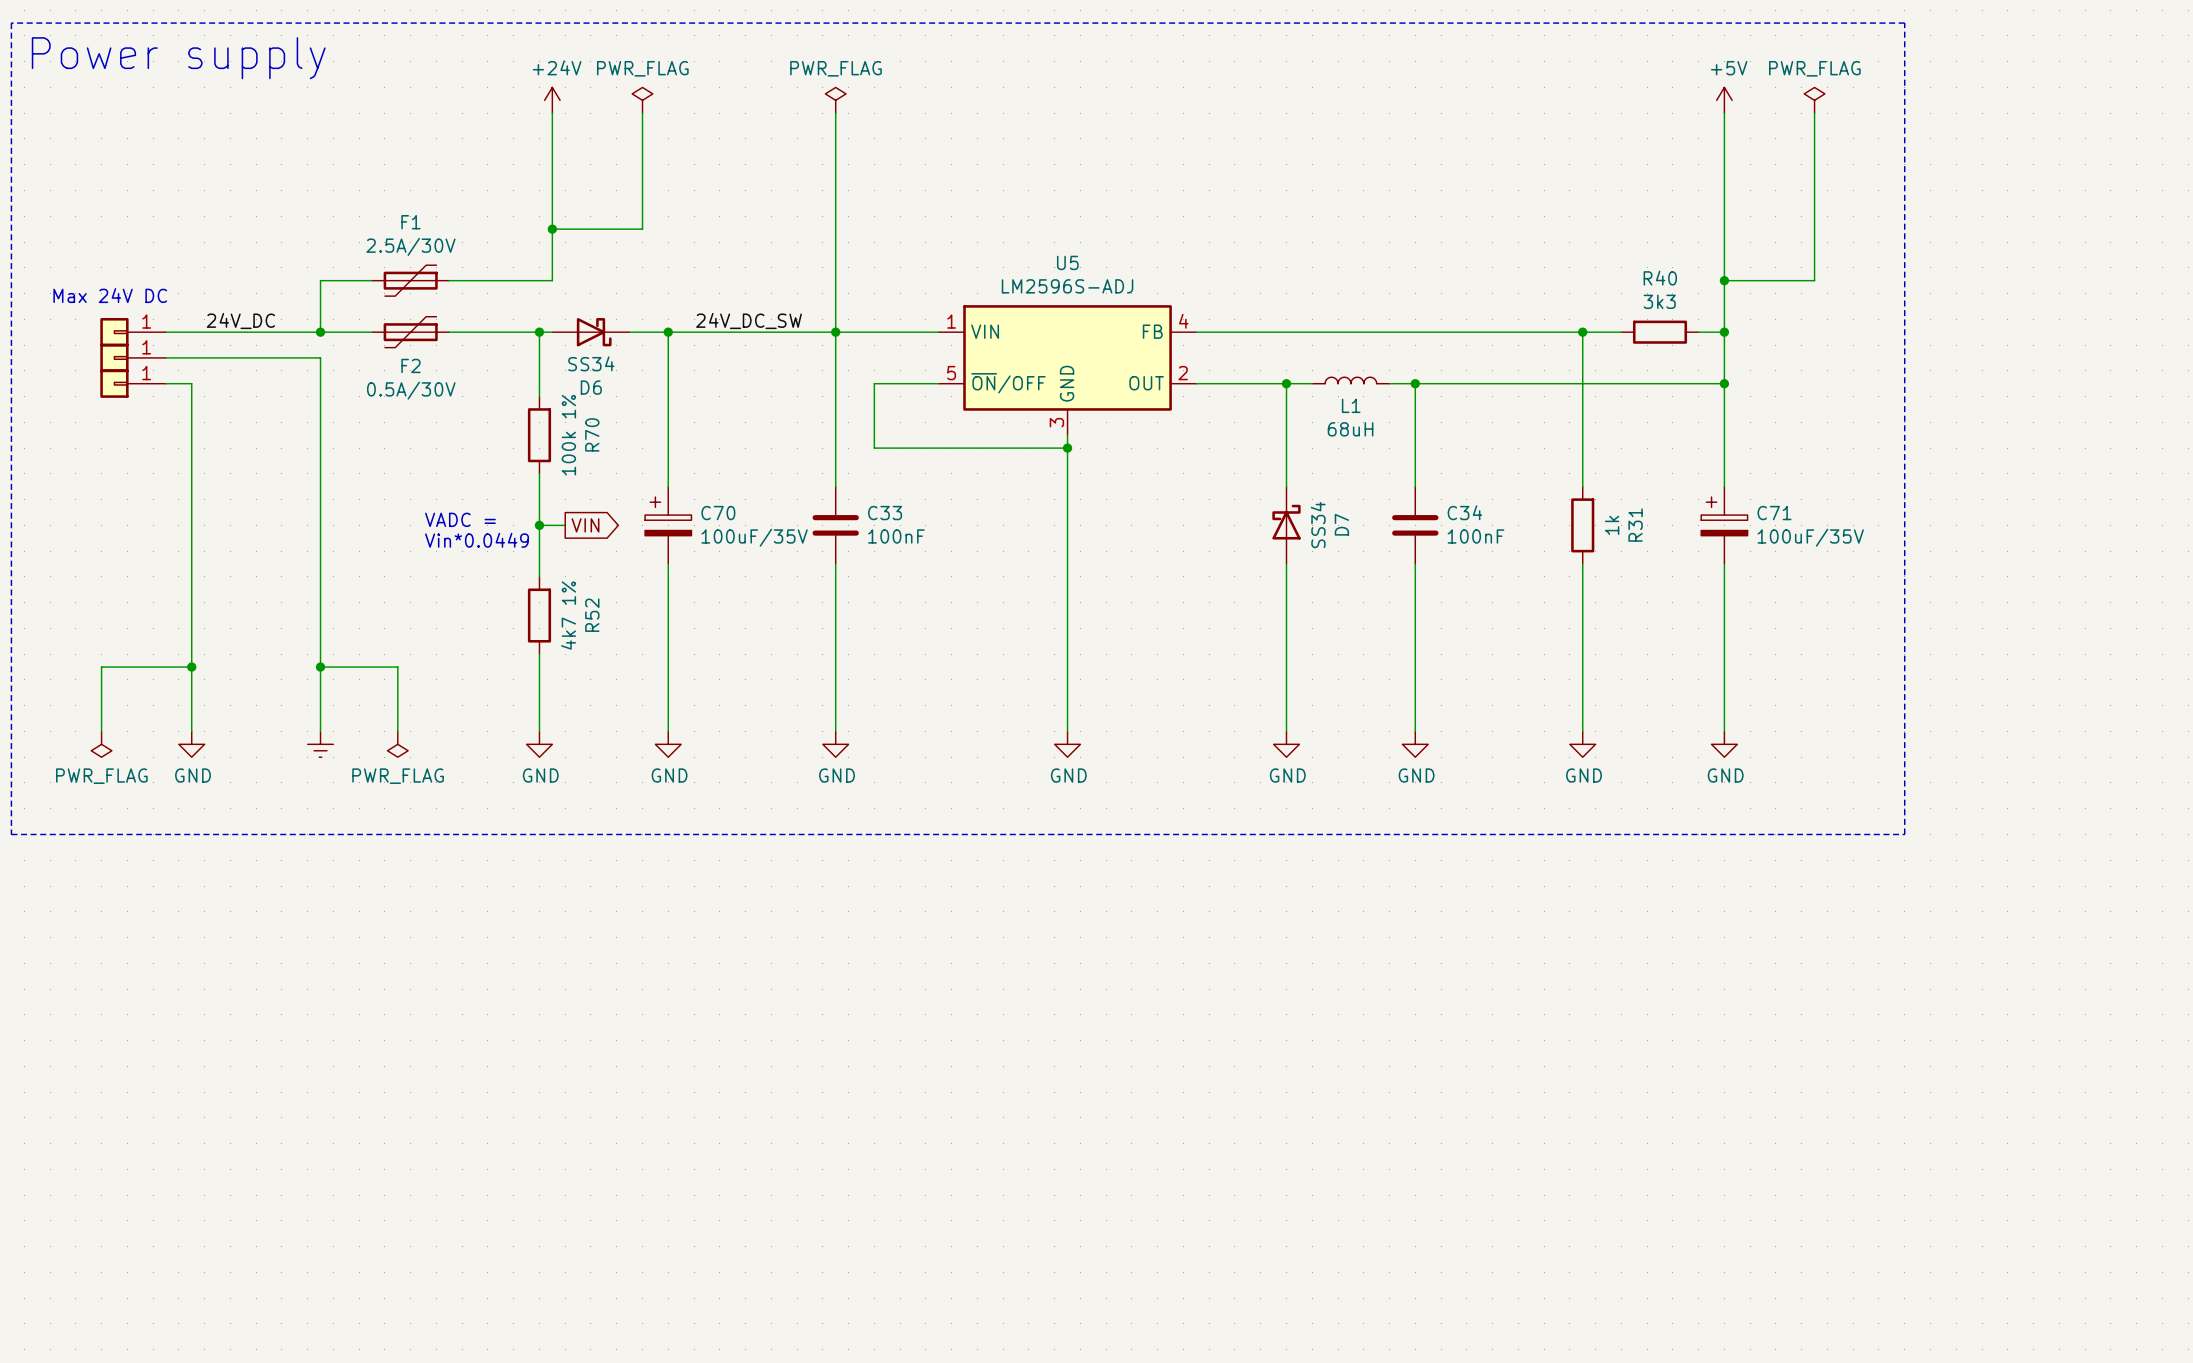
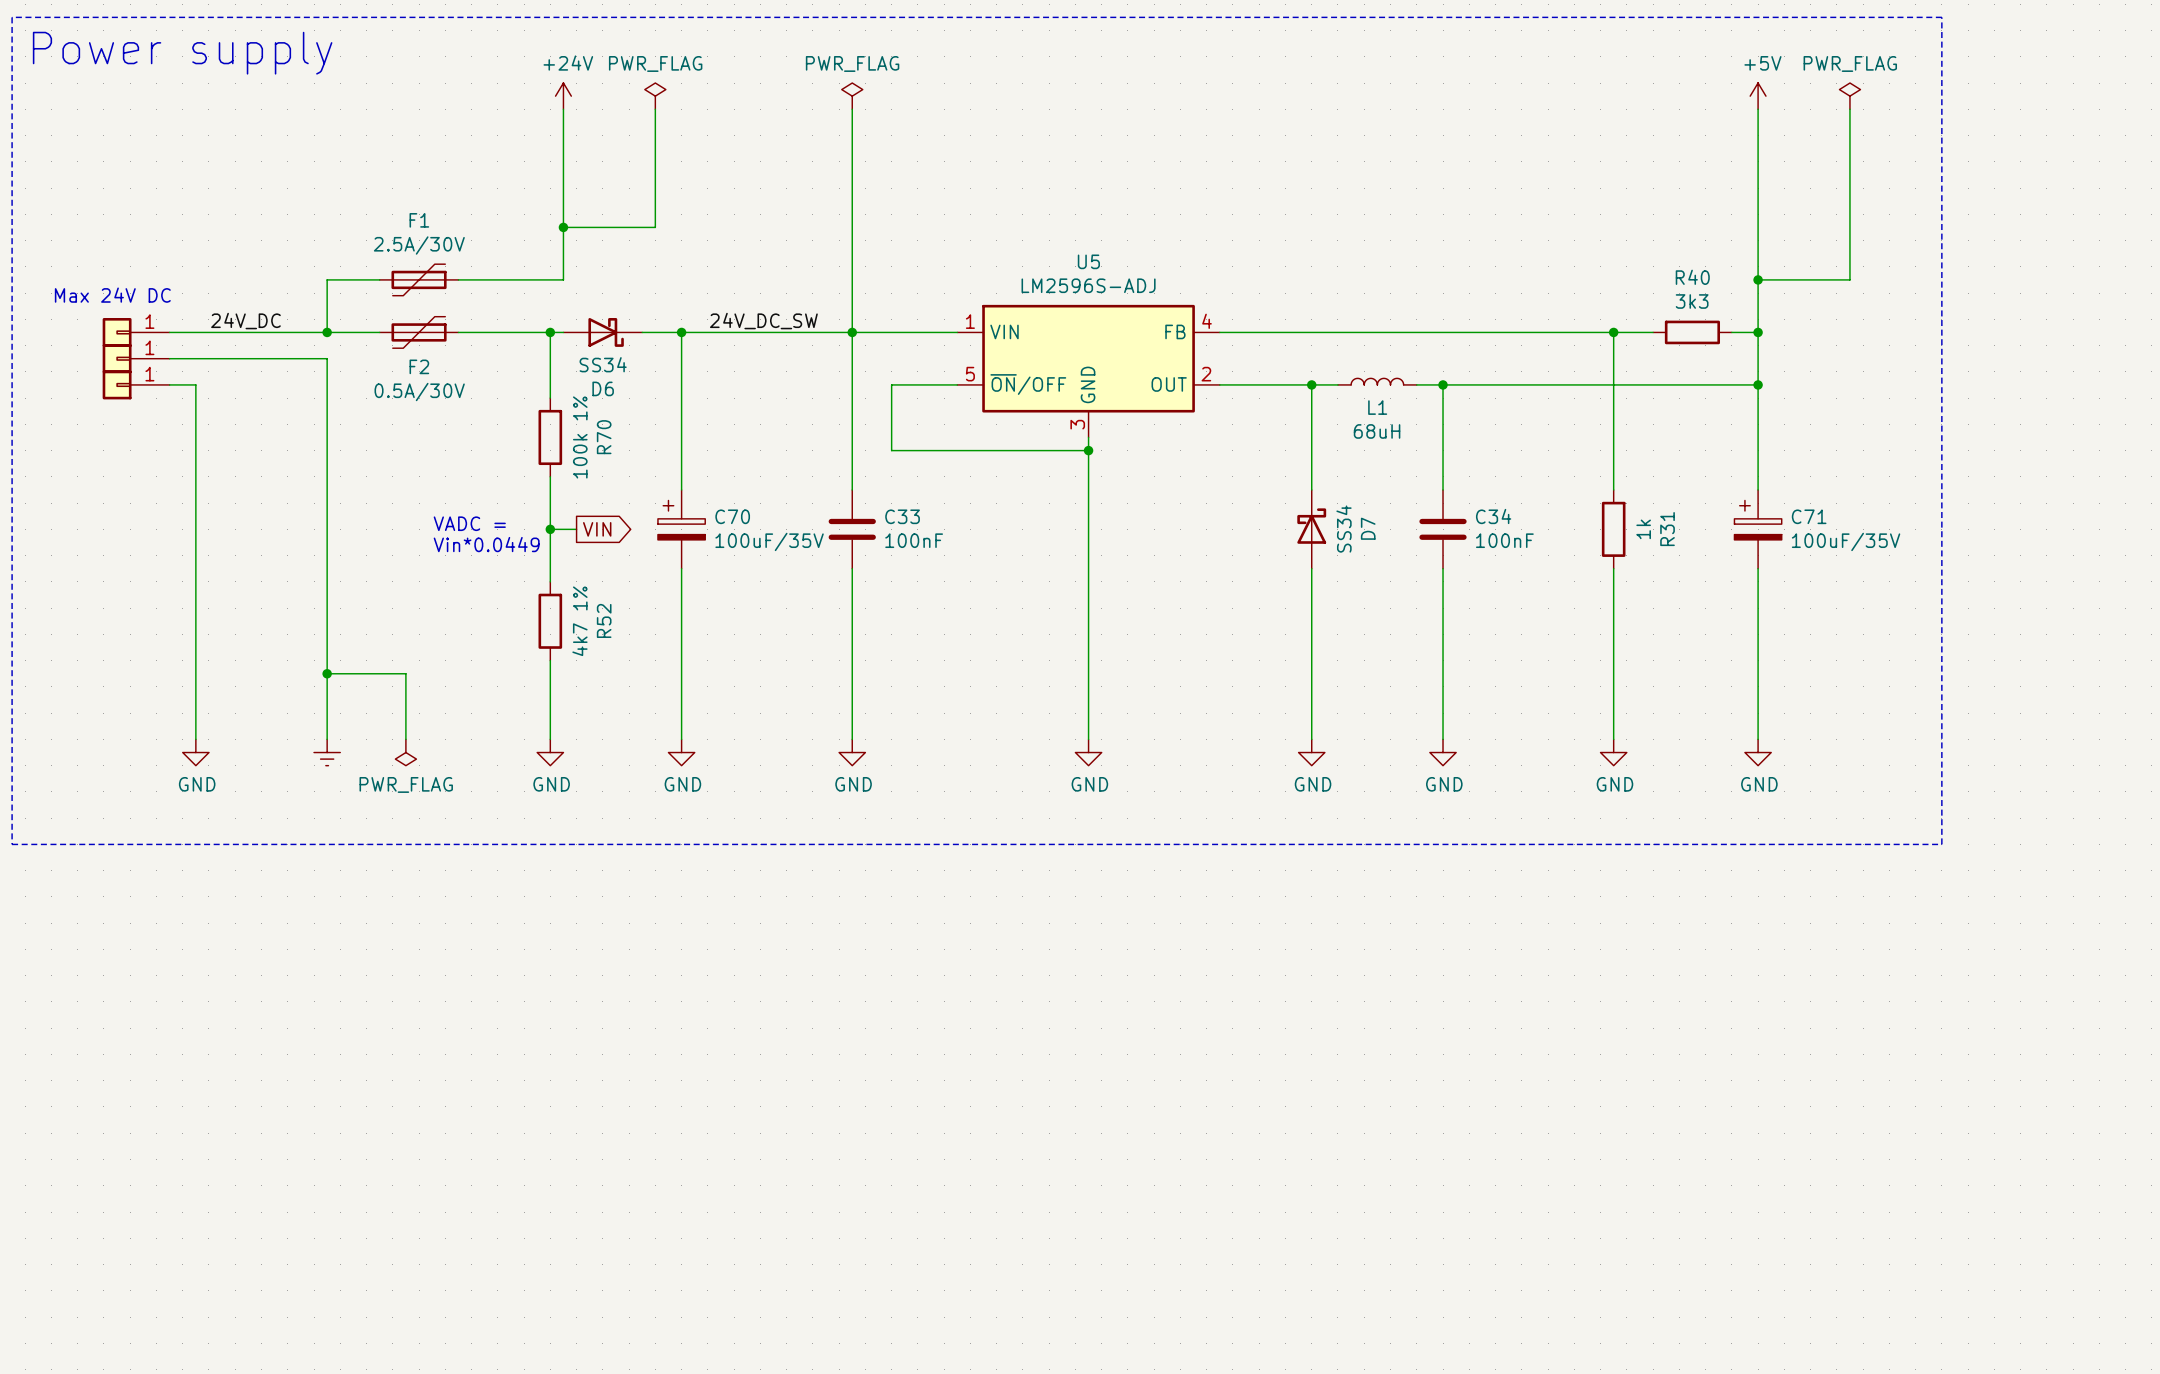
wire: (191, 667) (101, 667) (101, 731) -> none
junction: (191, 667) -> none
power symbol: PWR_FLAG (101, 744) -> none

